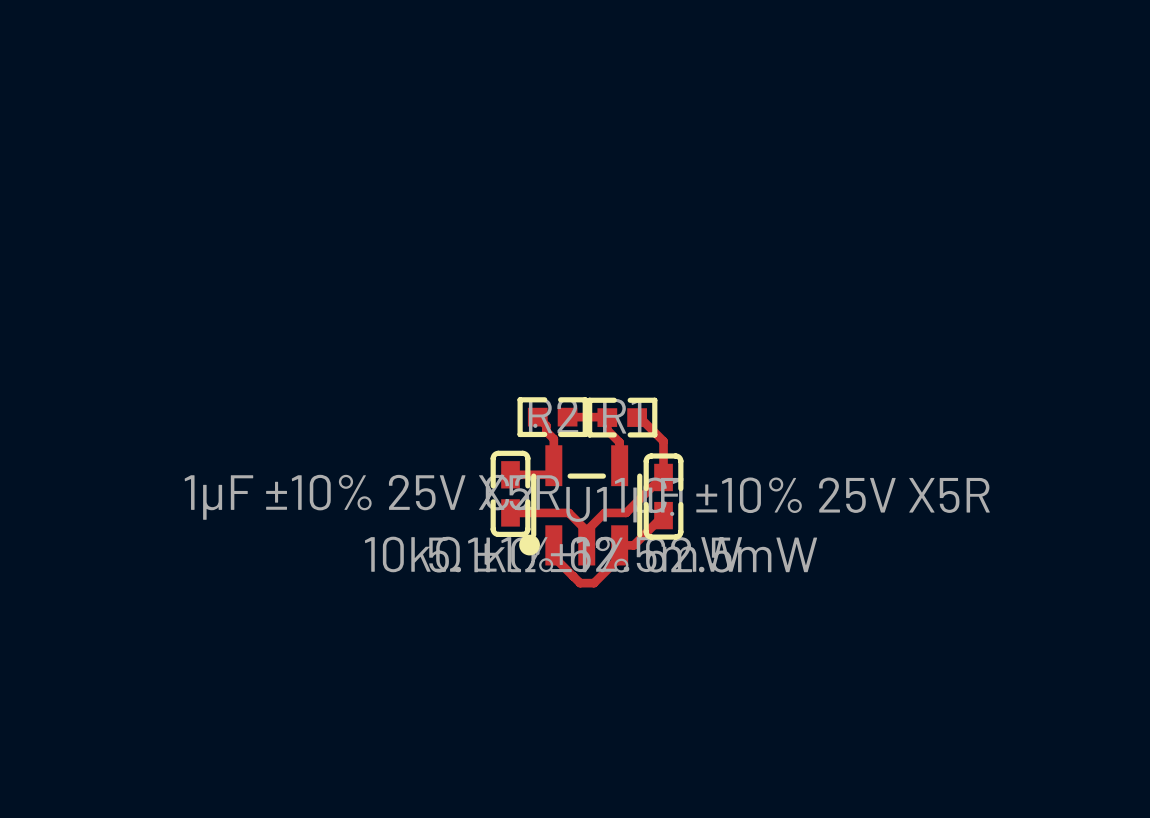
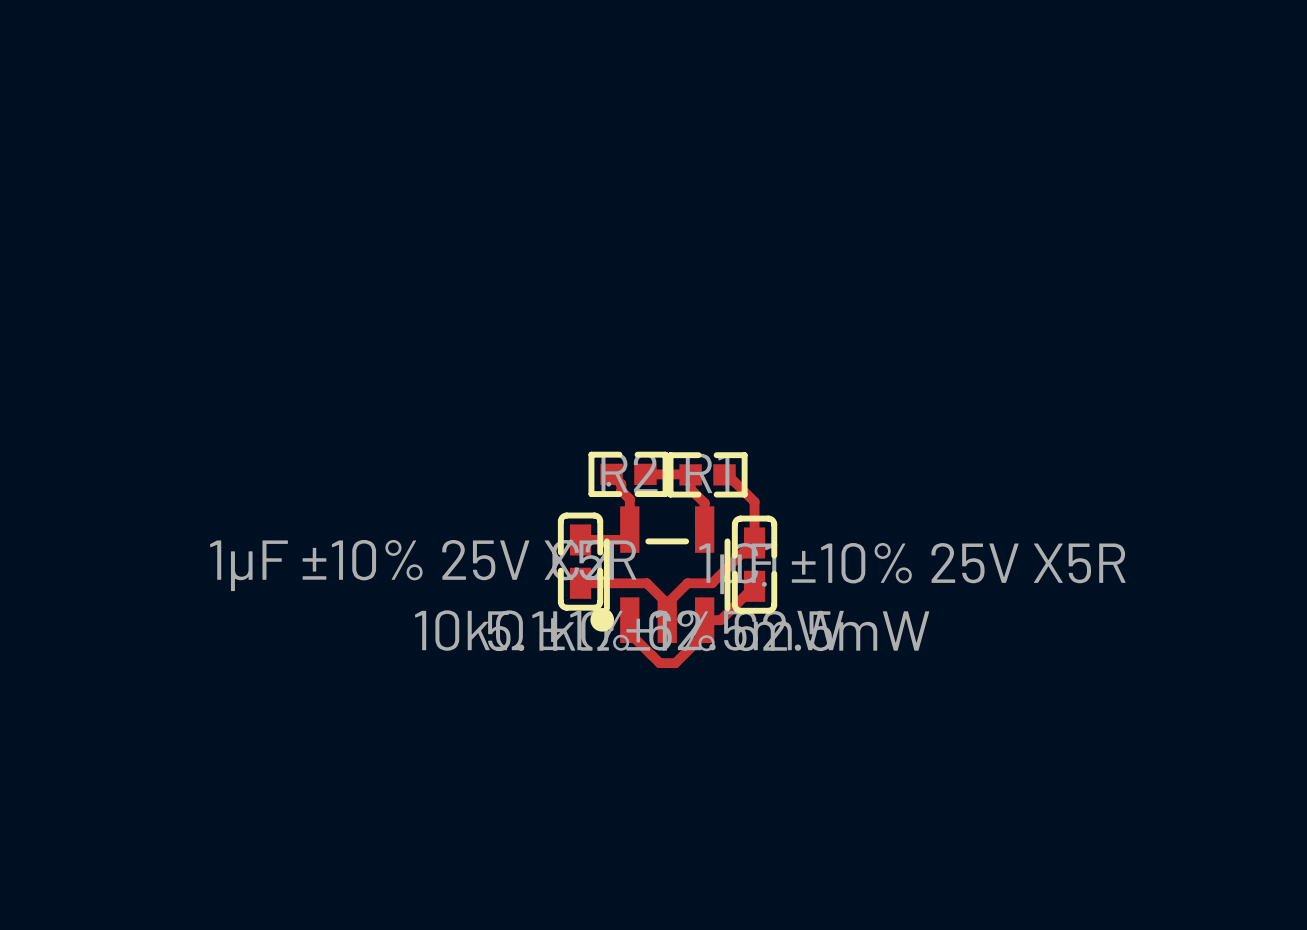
U1 name: U1 (586, 504) -> none

